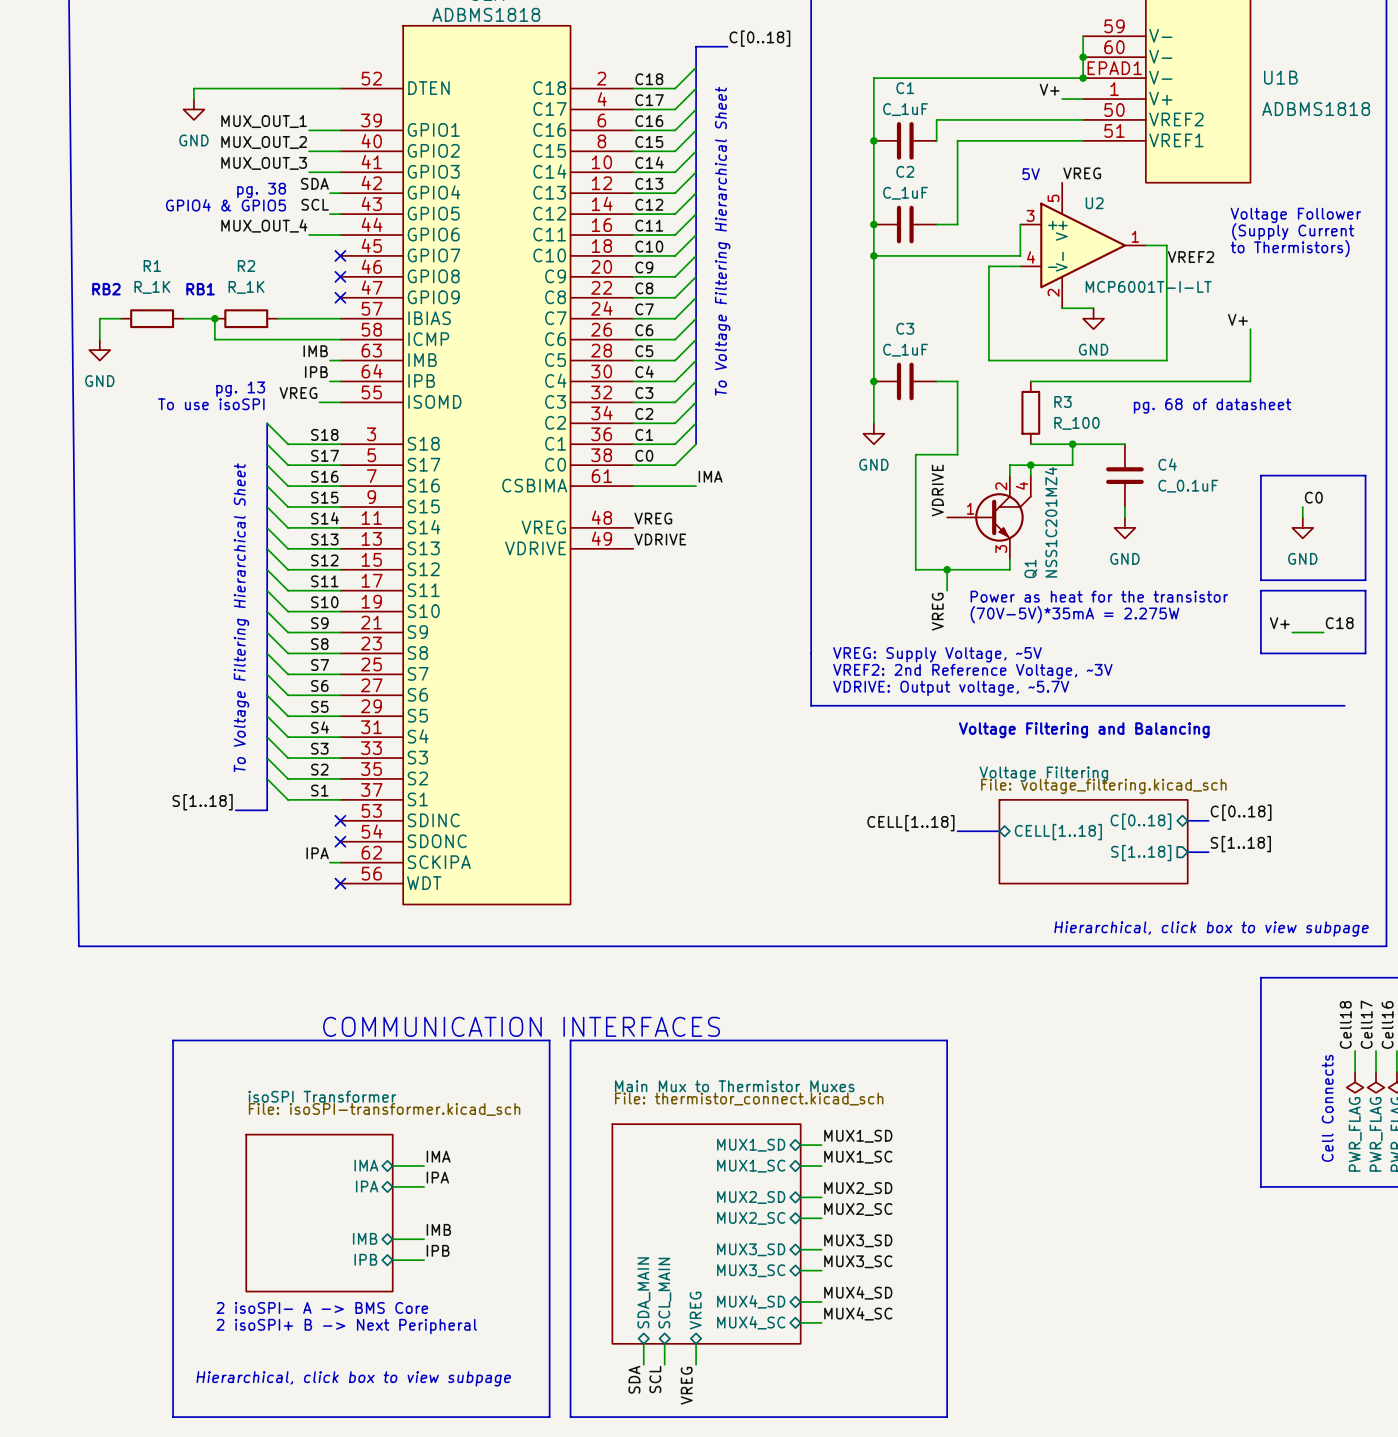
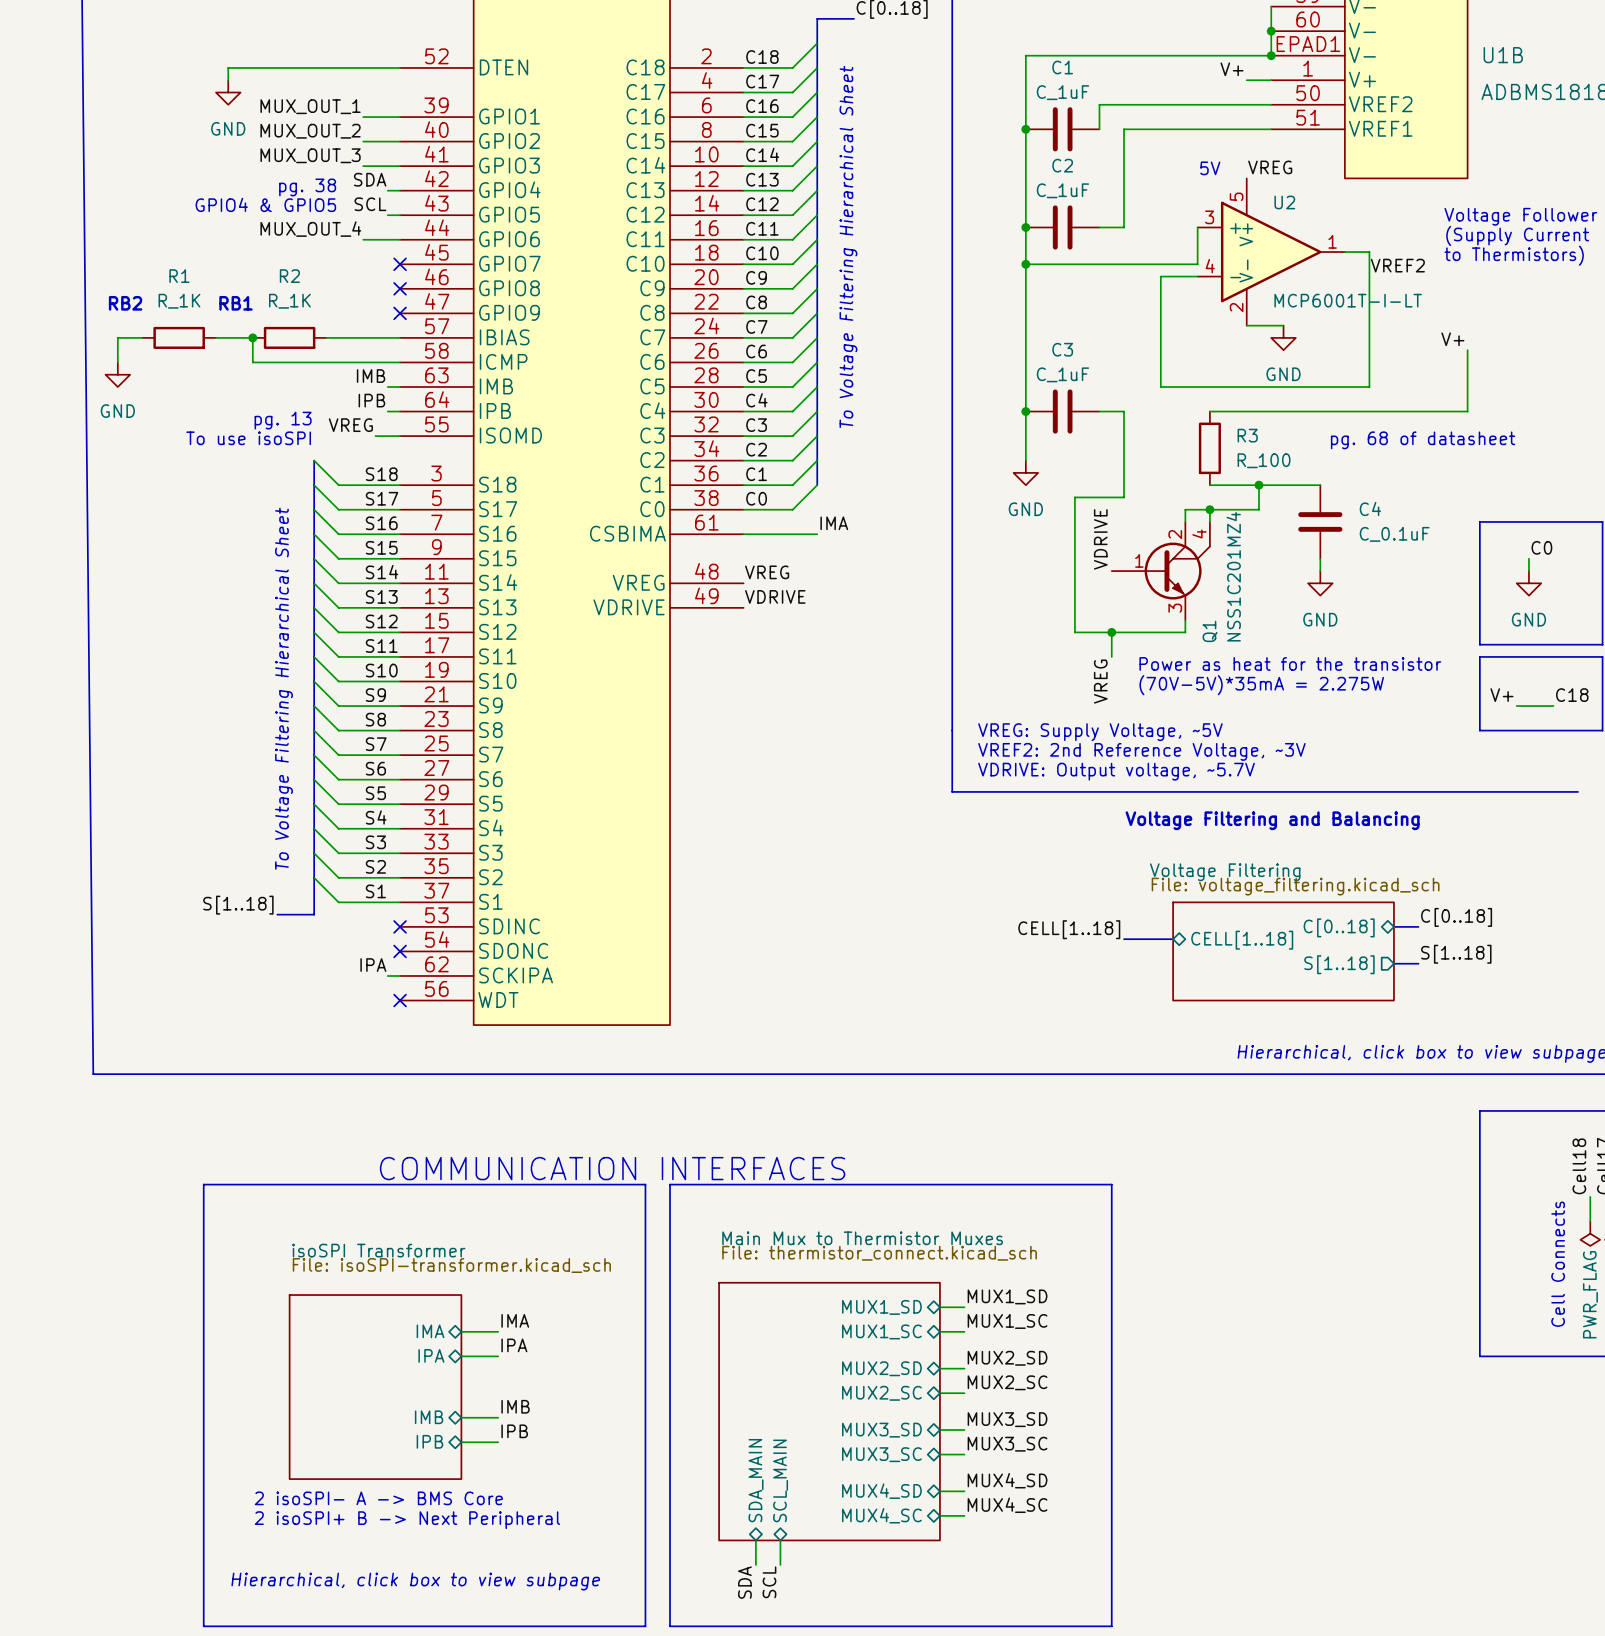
sheet pin: VREG (695, 1310) -> none
wire: (696, 1343) (696, 1364) -> none
label: VREG (686, 1385) -> none

